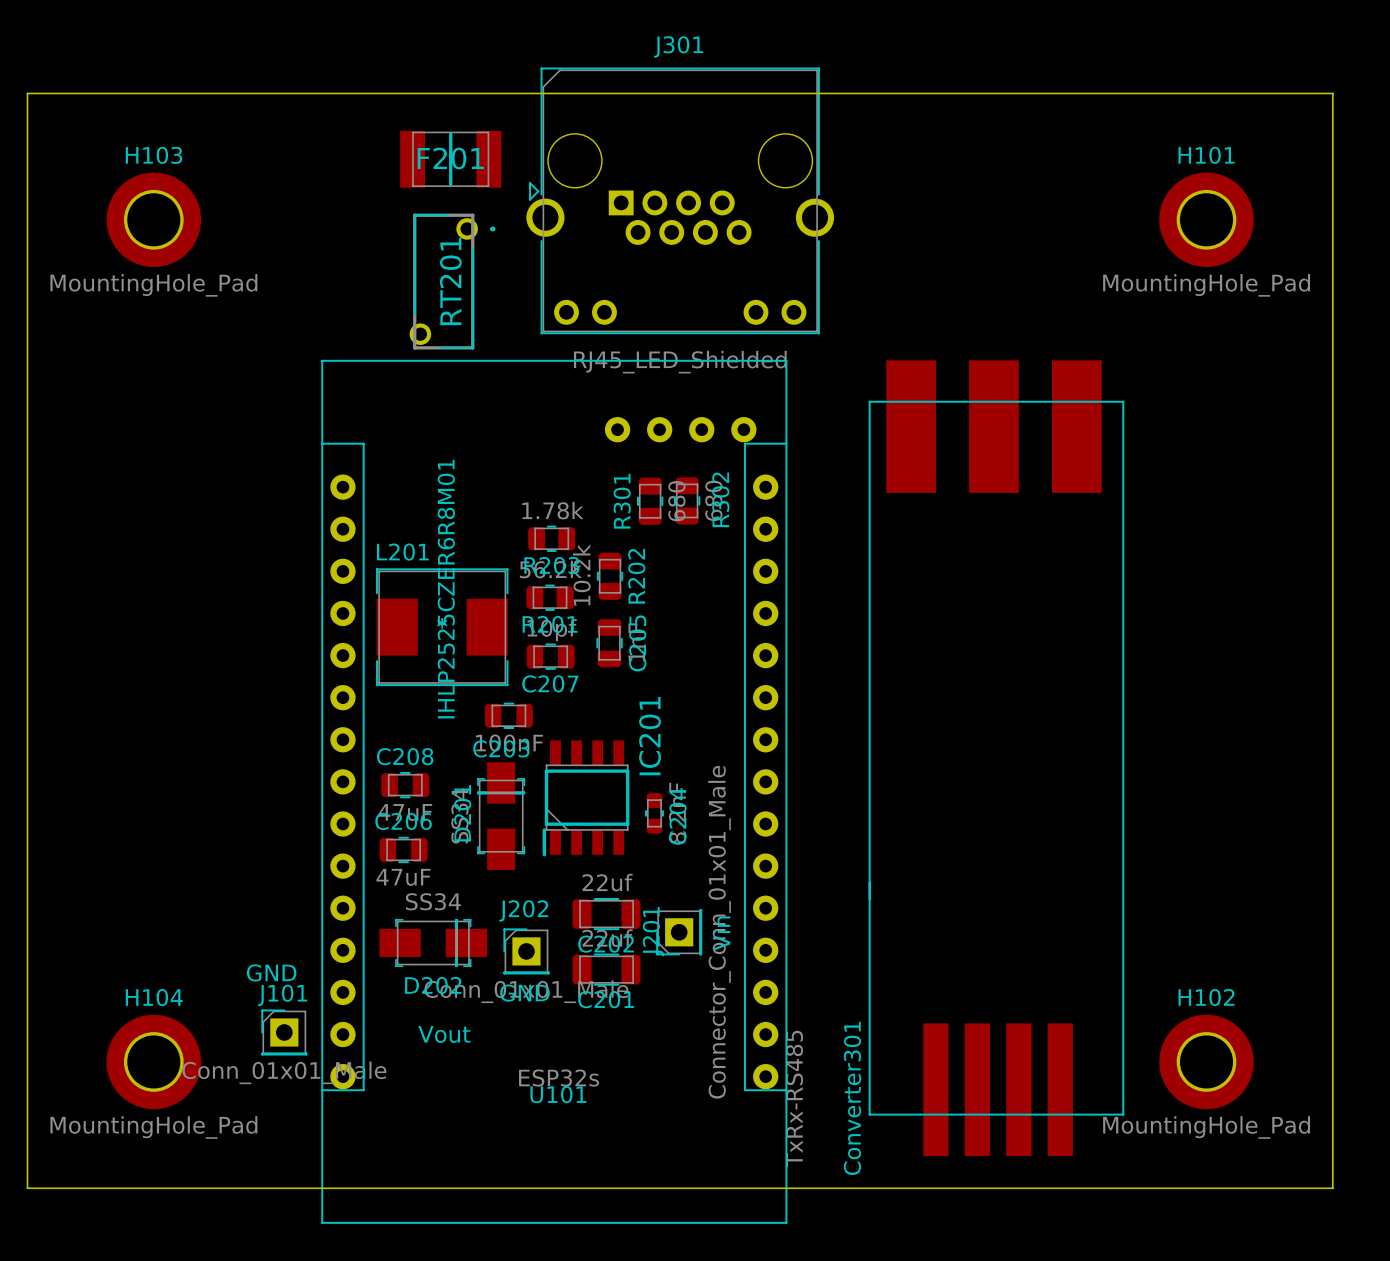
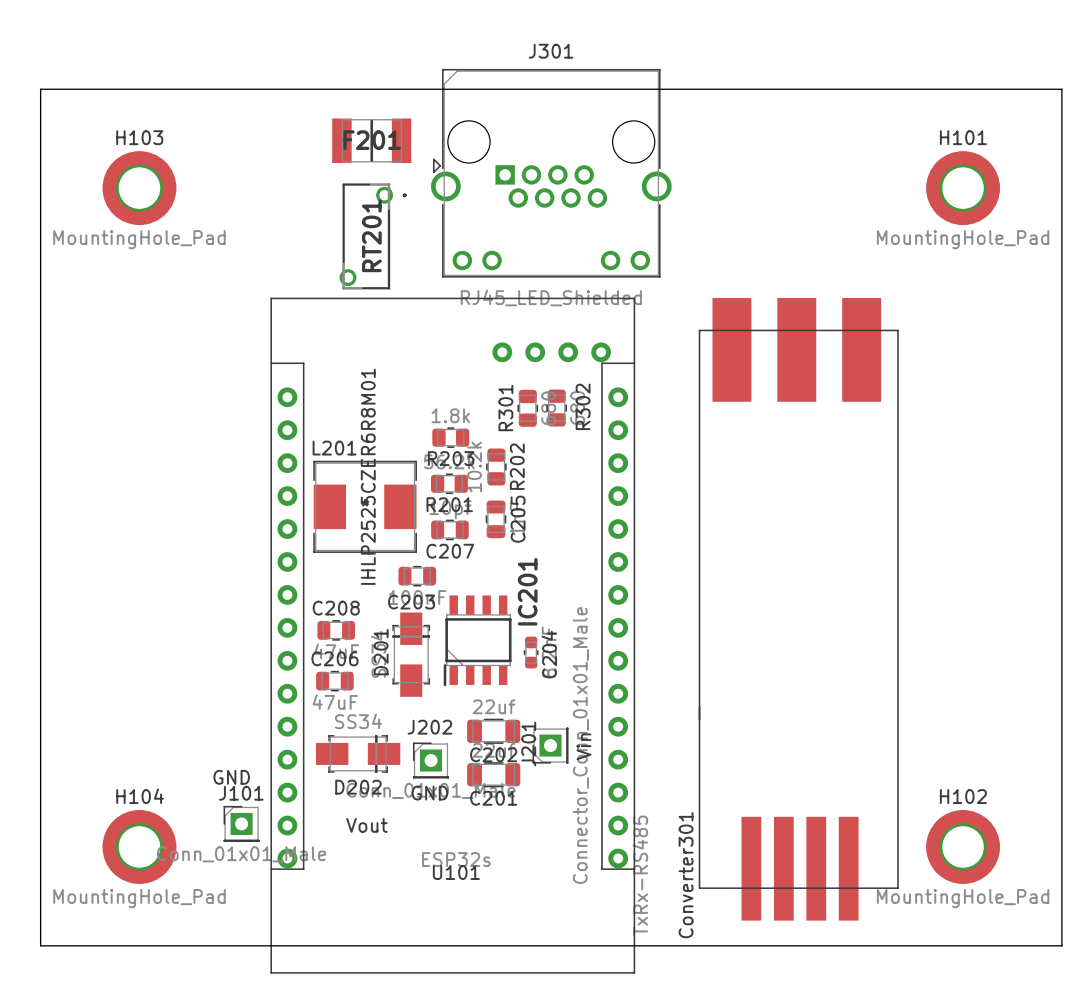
R203 value: 1.78k (552, 510) -> 1.8k (450, 415)

